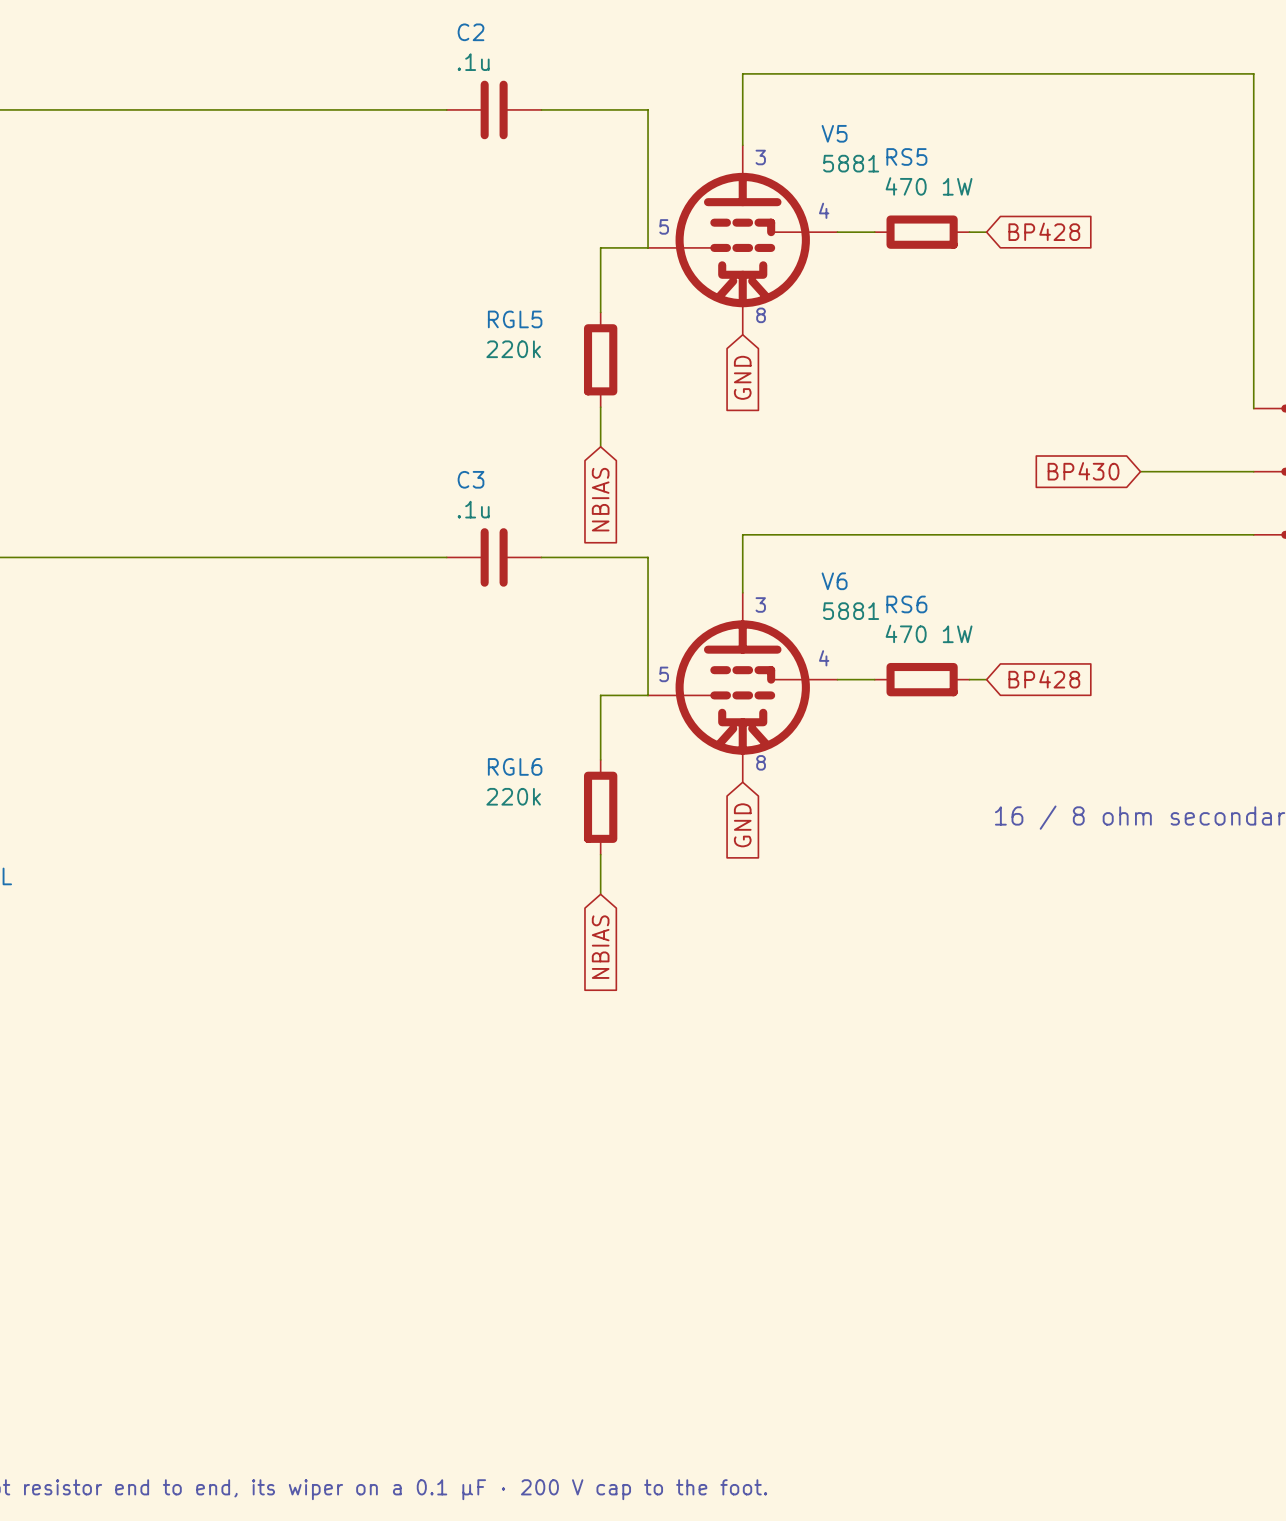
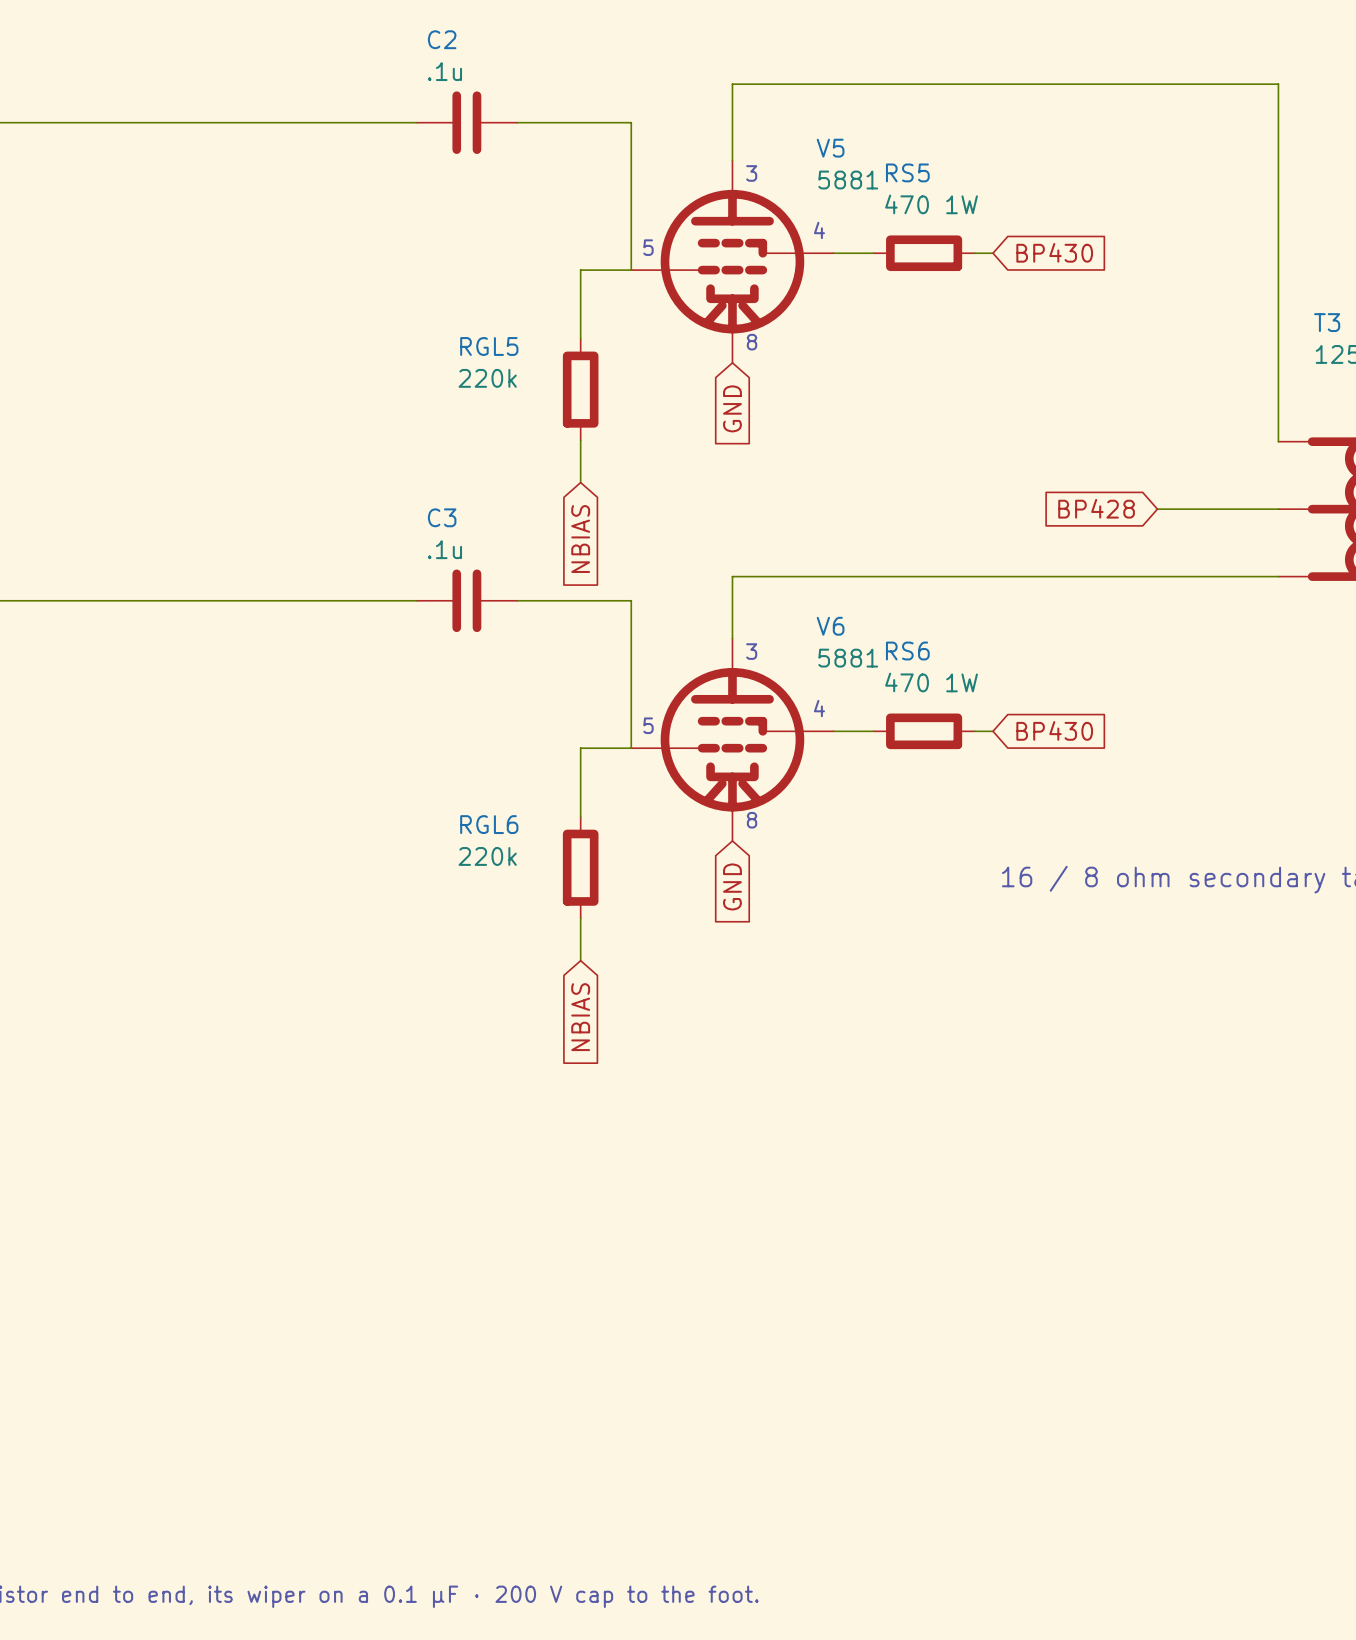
global label: BP428 (1044, 231) -> BP430 (1054, 252)
global label: BP430 (1083, 471) -> BP428 (1096, 508)
global label: BP428 (1044, 679) -> BP430 (1054, 730)

